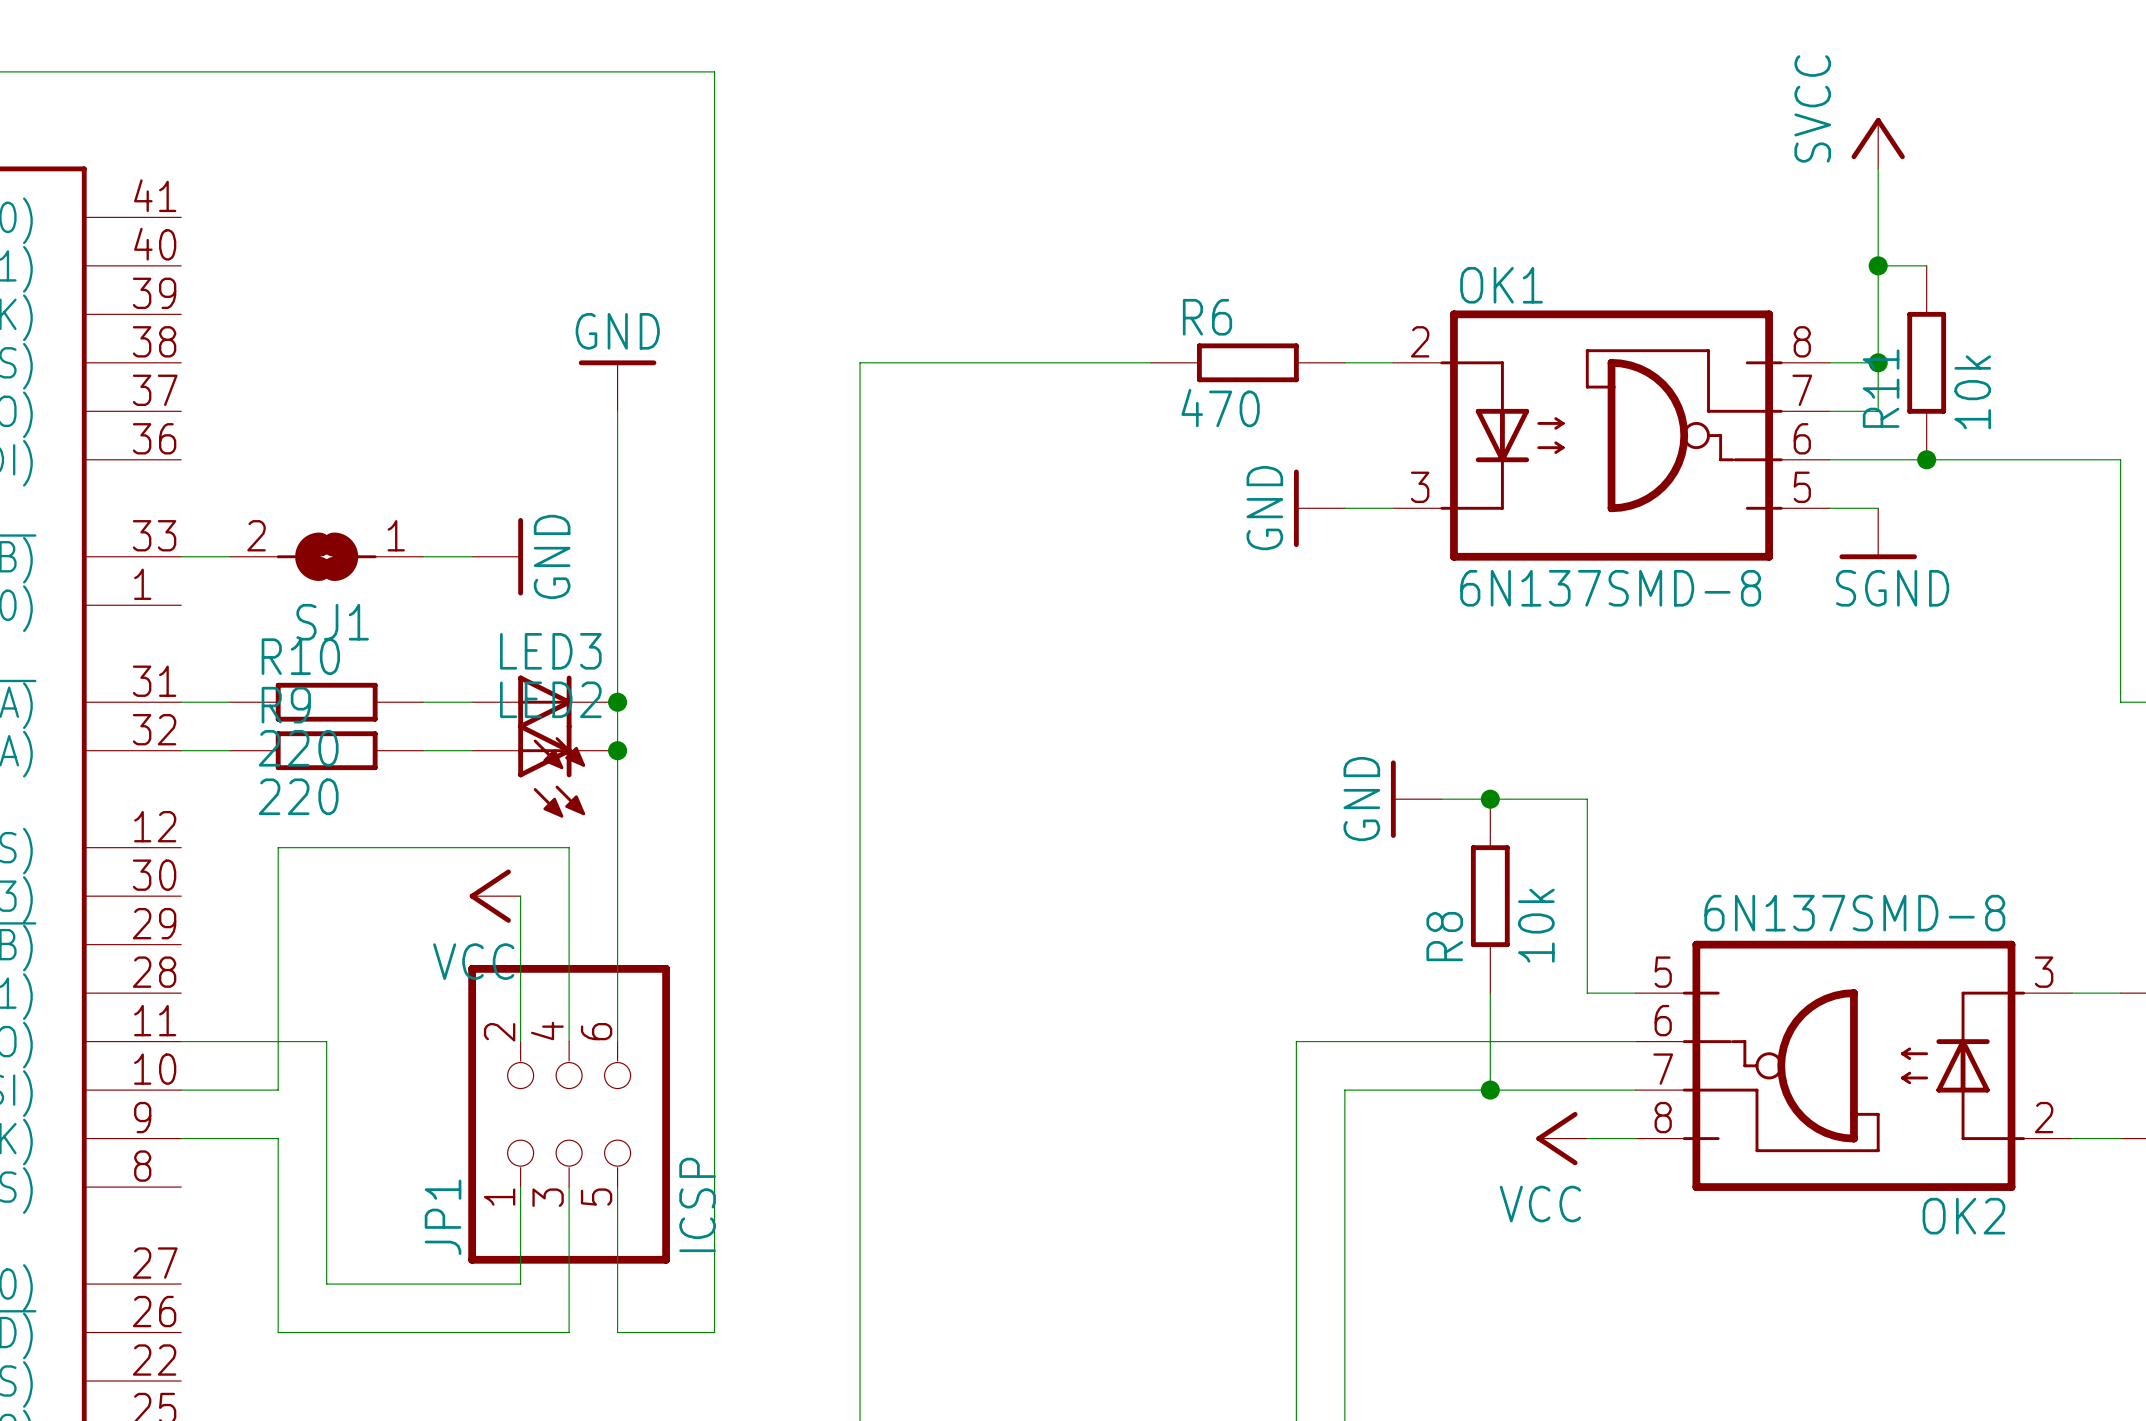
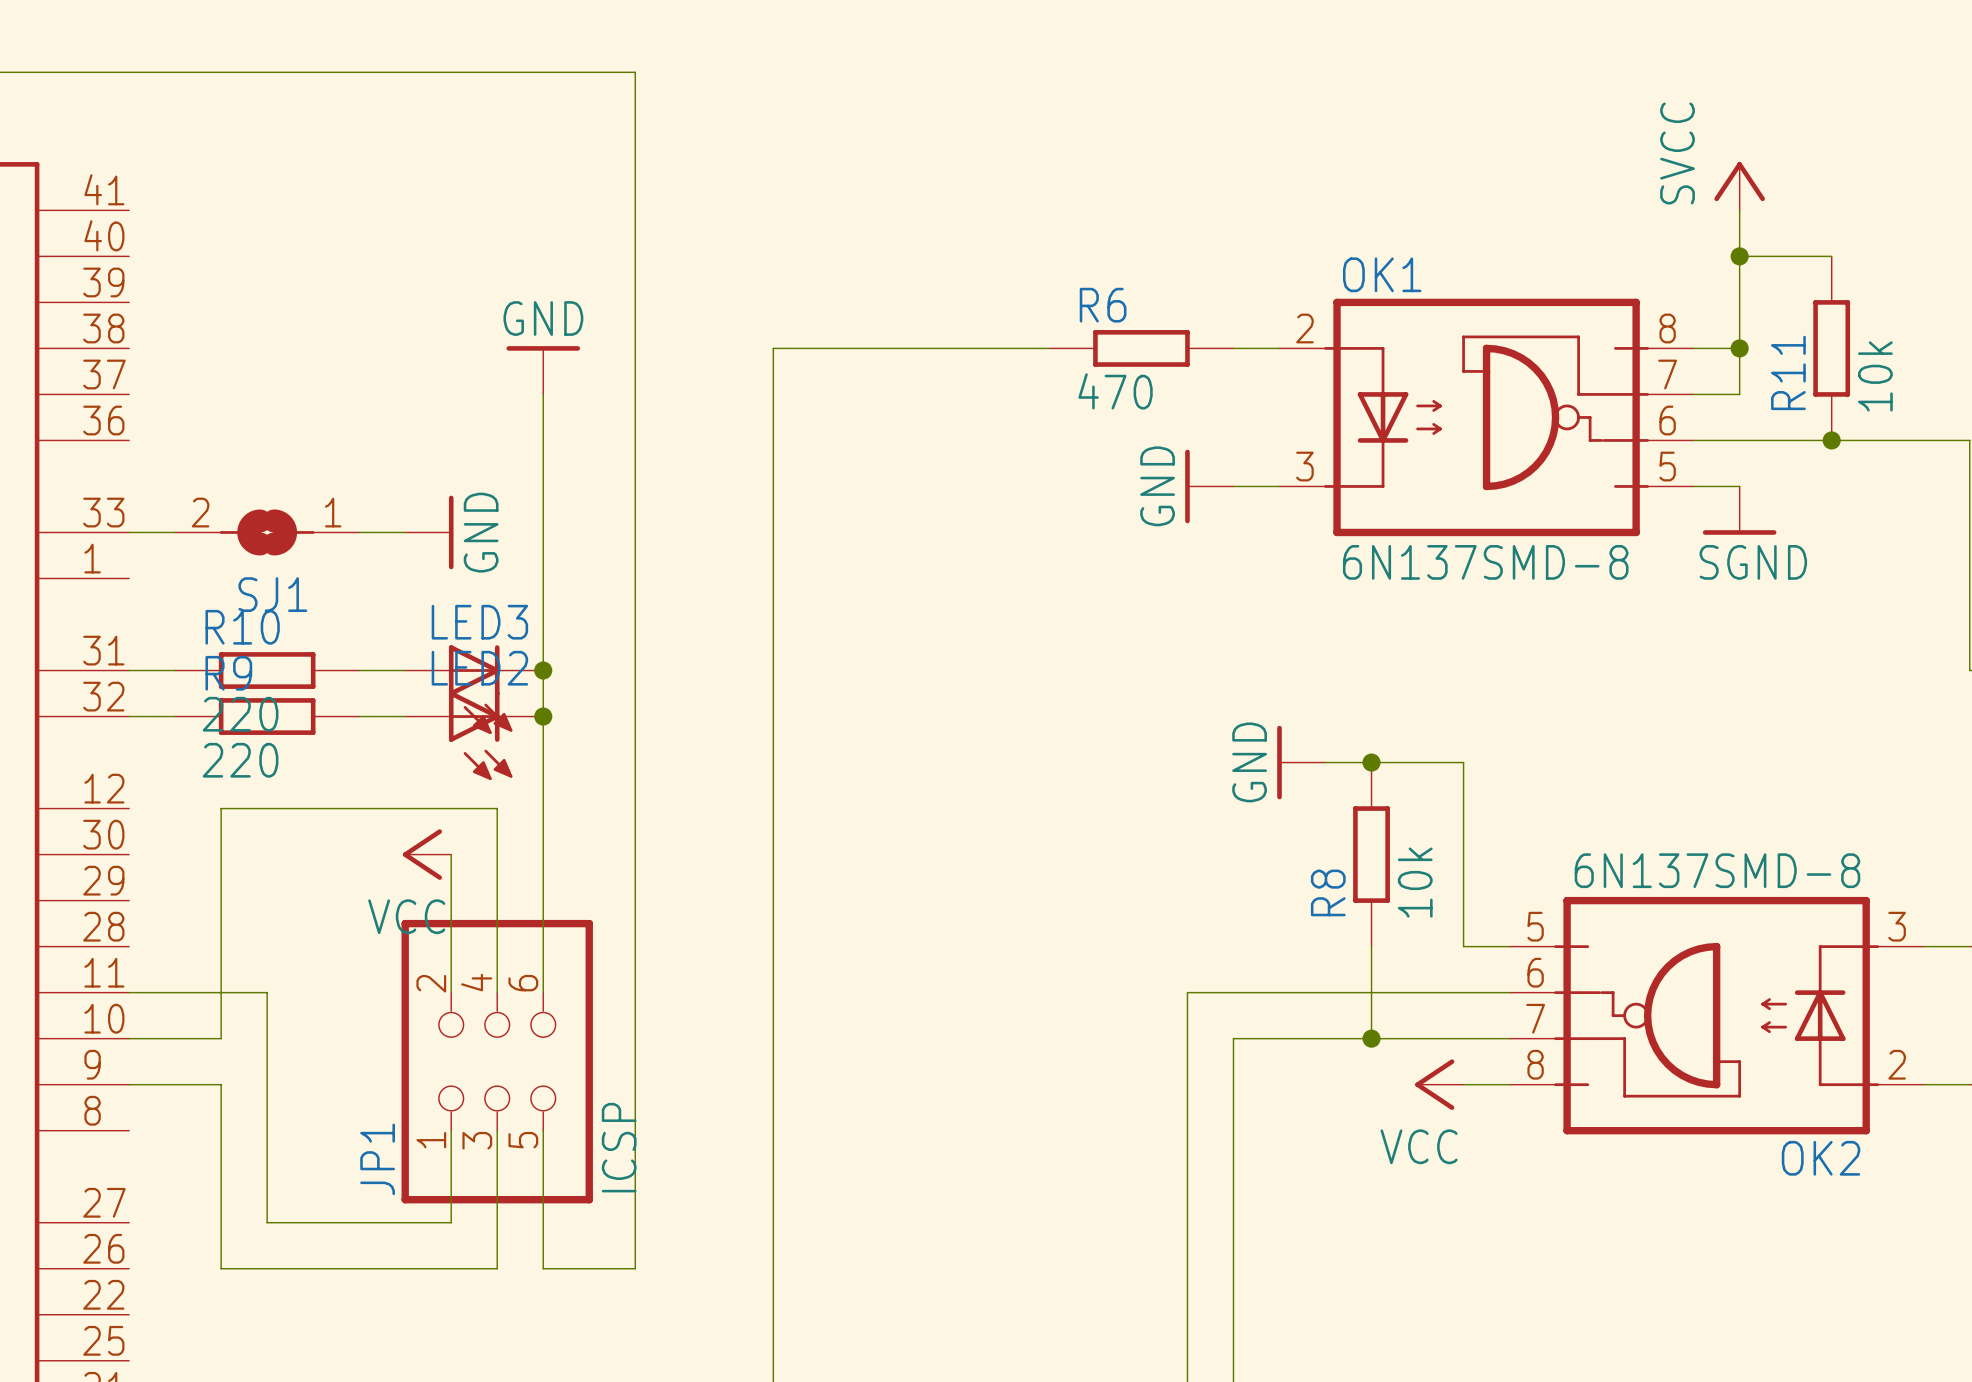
power symbol position: SVCC (1878, 143) -> SVCC (1739, 186)
wire: none -> (1785, 256) (1831, 256)
R11 position: (1926, 362) -> (1831, 348)
junction position: (1926, 459) -> (1831, 440)

